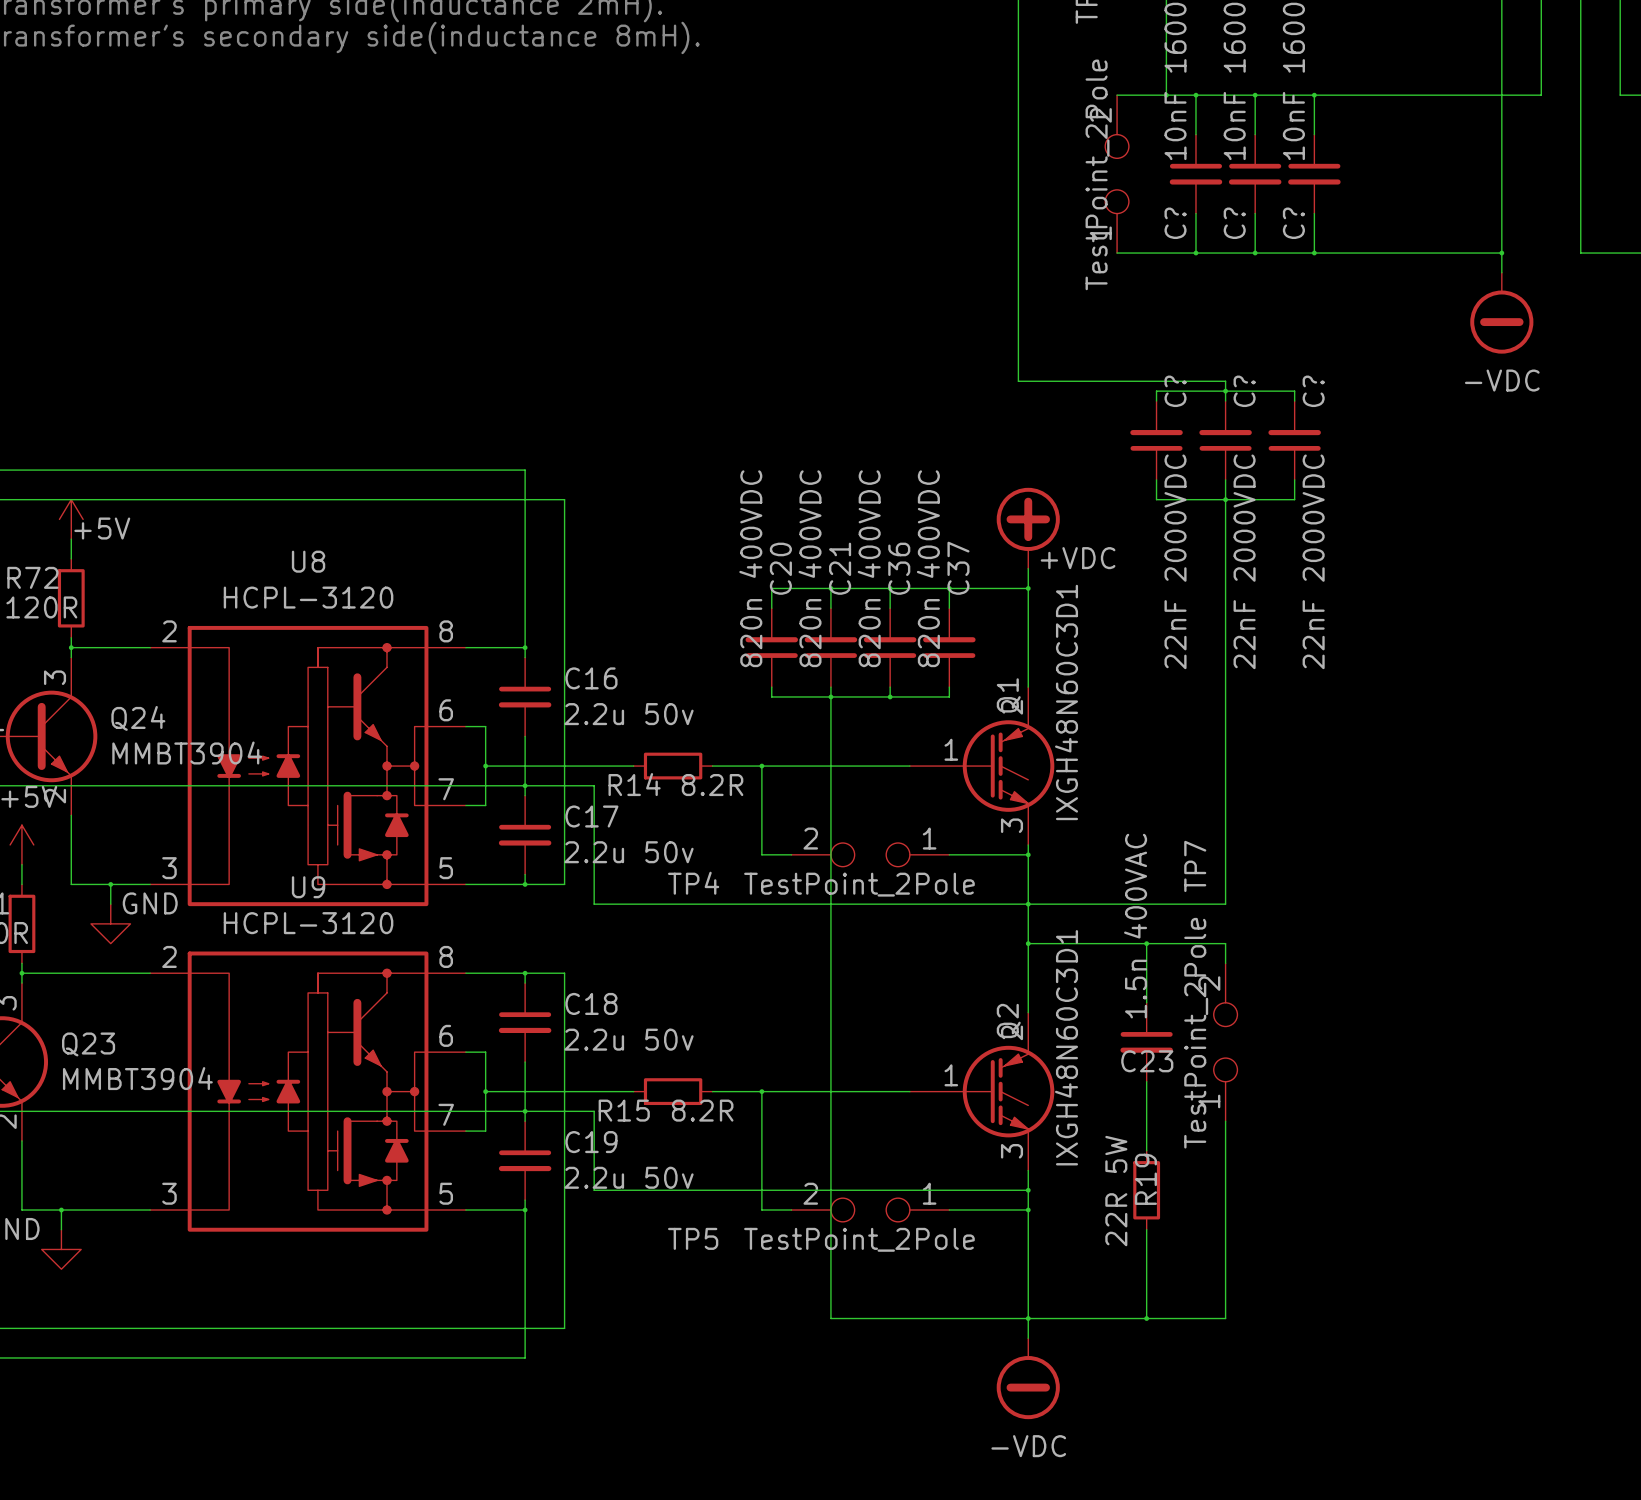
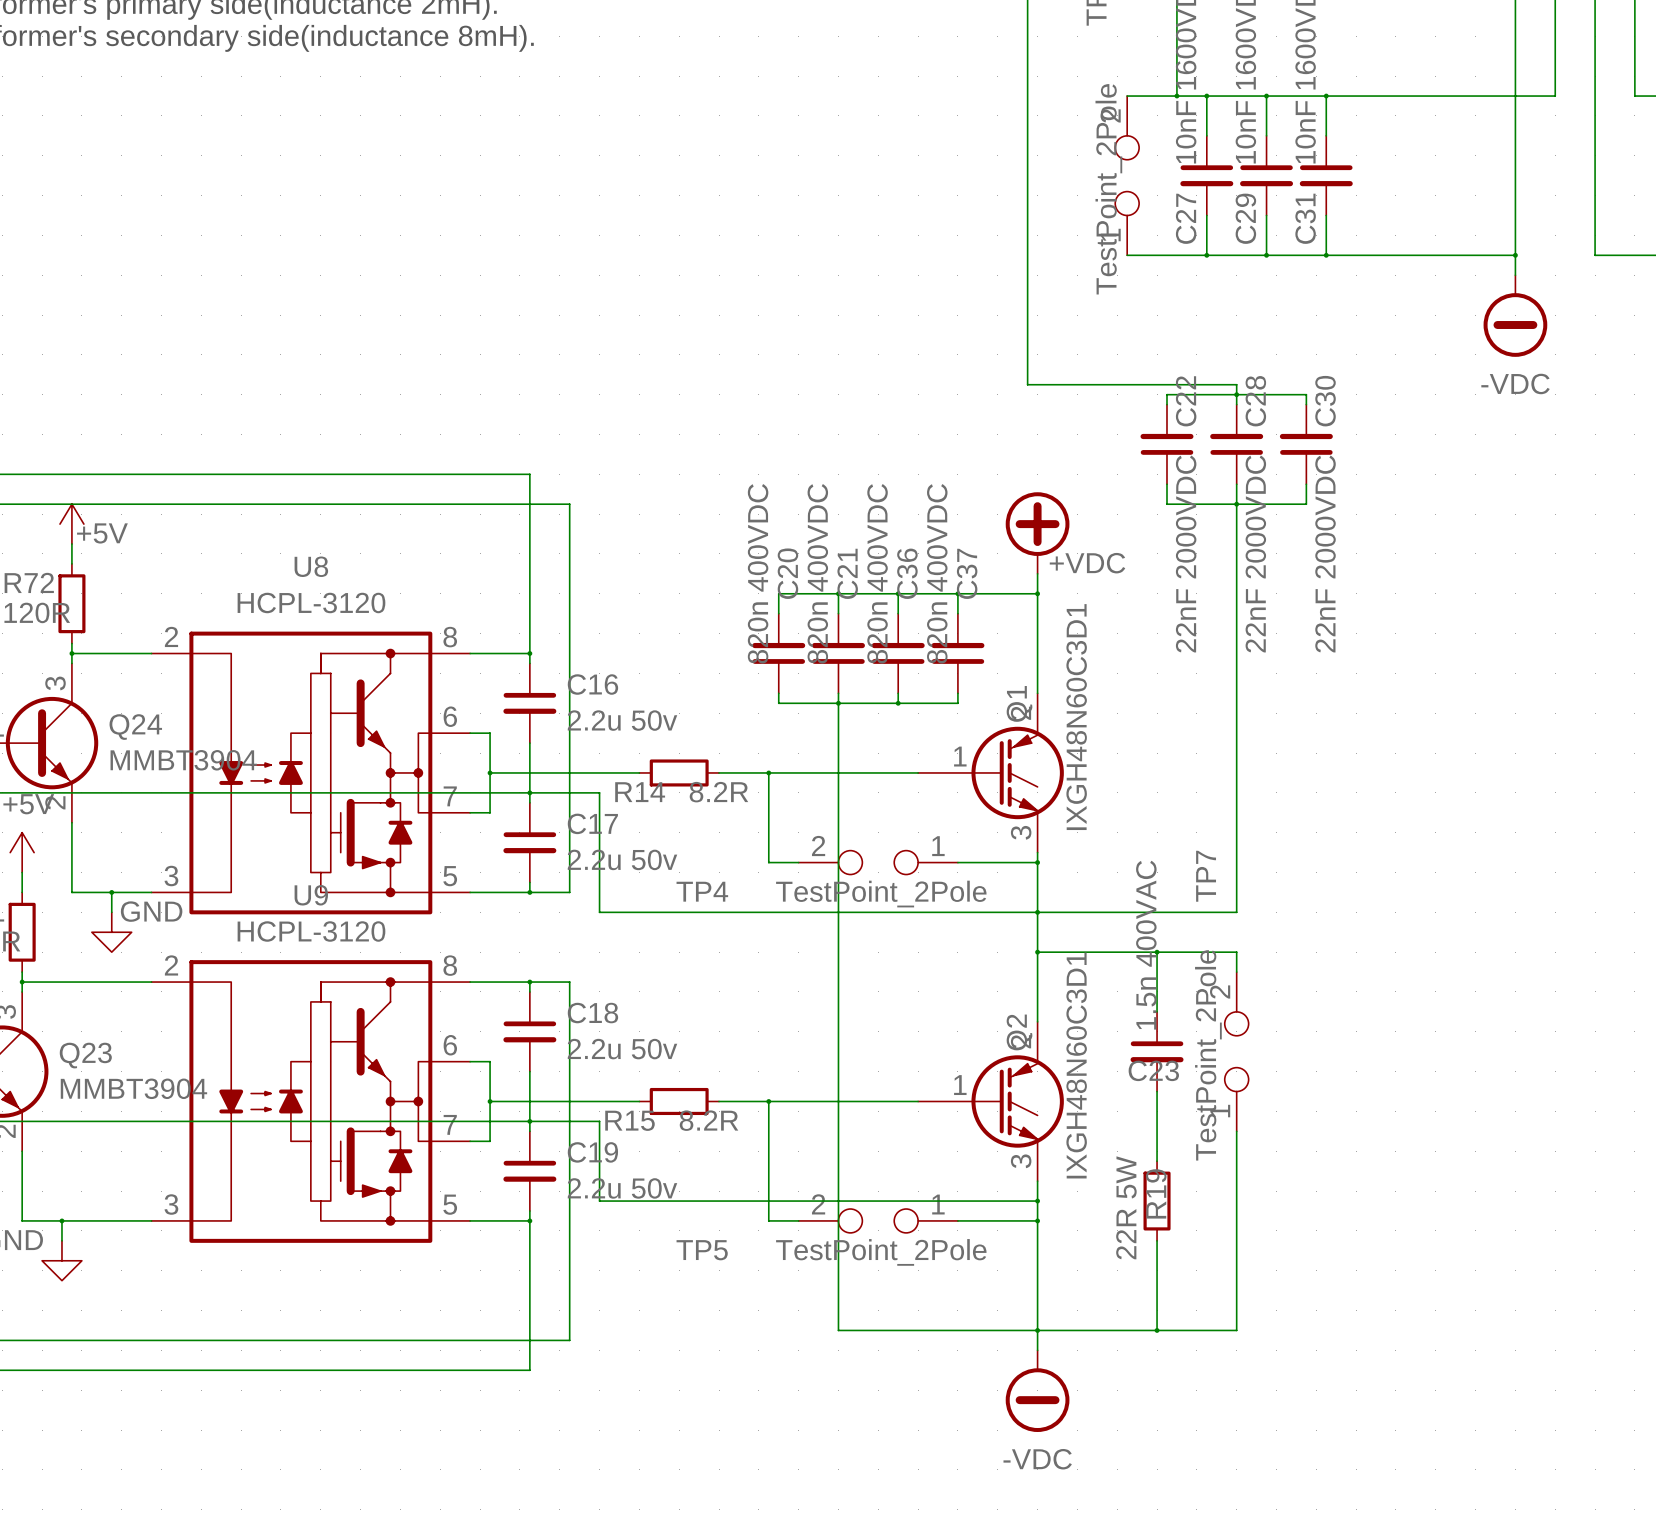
C? name: C? (1175, 223) -> C27 (1186, 218)
C? name: C? (1234, 223) -> C29 (1245, 218)
C? name: C? (1293, 223) -> C31 (1305, 218)
C? name: C? (1175, 391) -> C22 (1186, 401)
C? name: C? (1244, 391) -> C28 (1255, 401)
C? name: C? (1313, 391) -> C30 (1325, 401)

